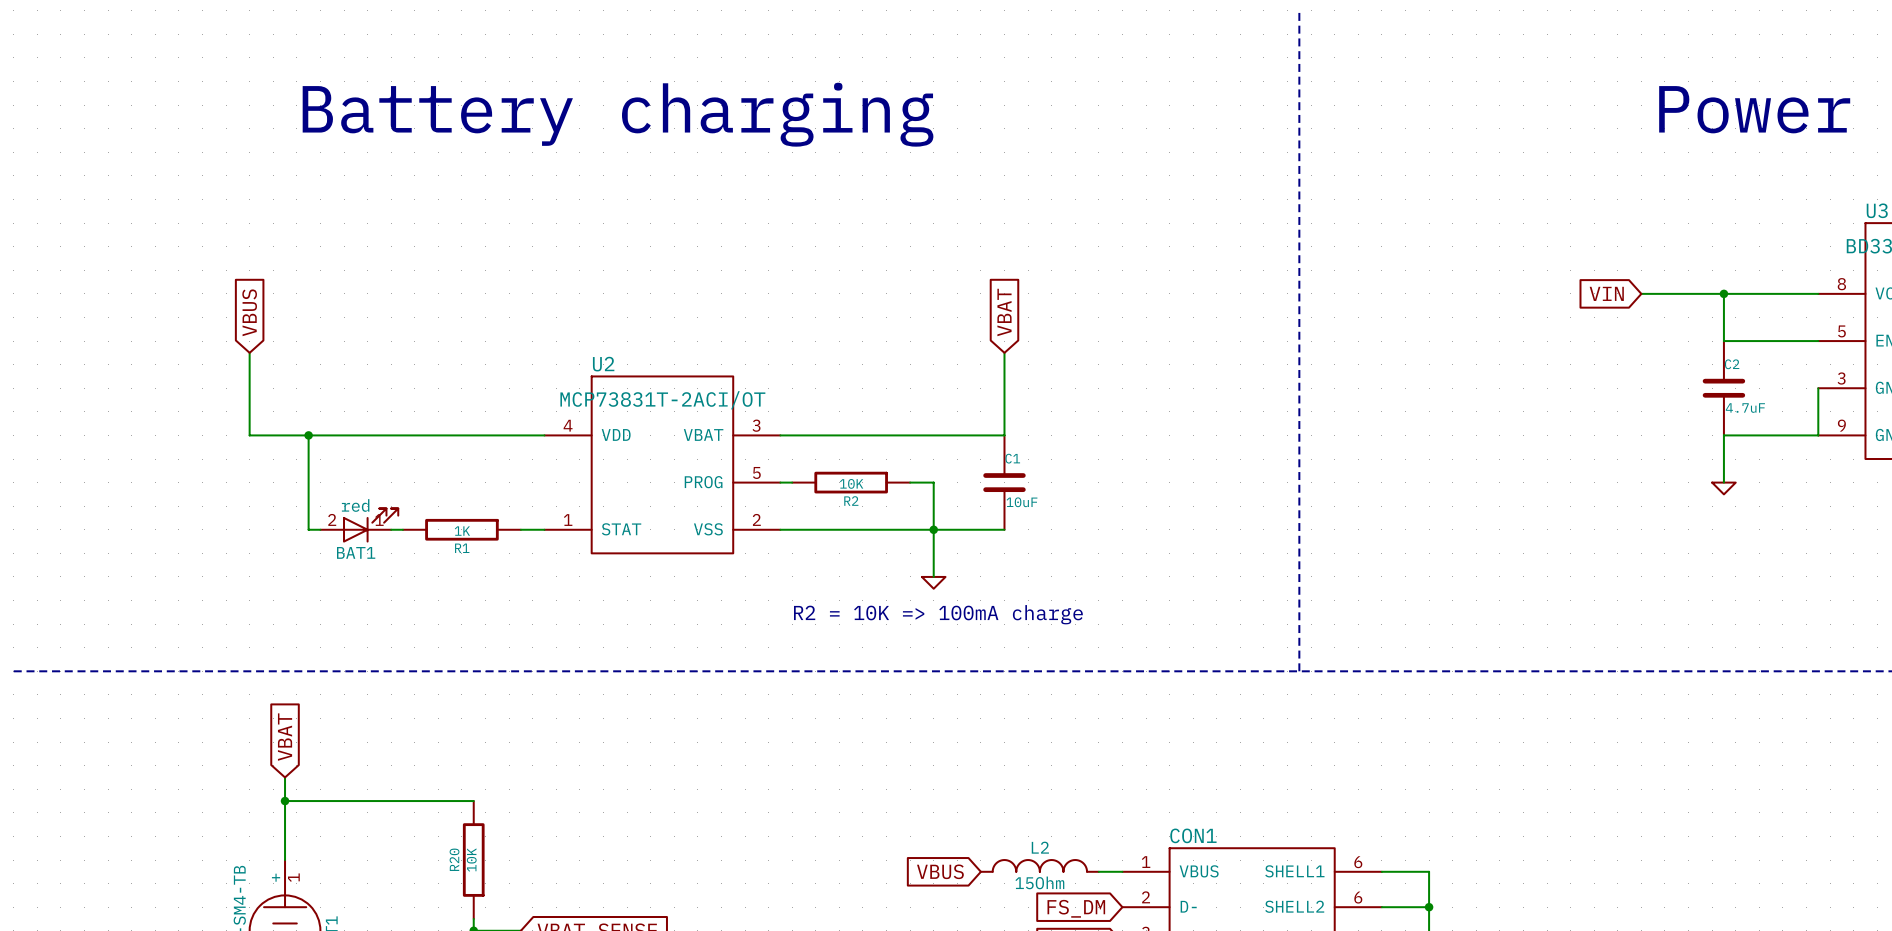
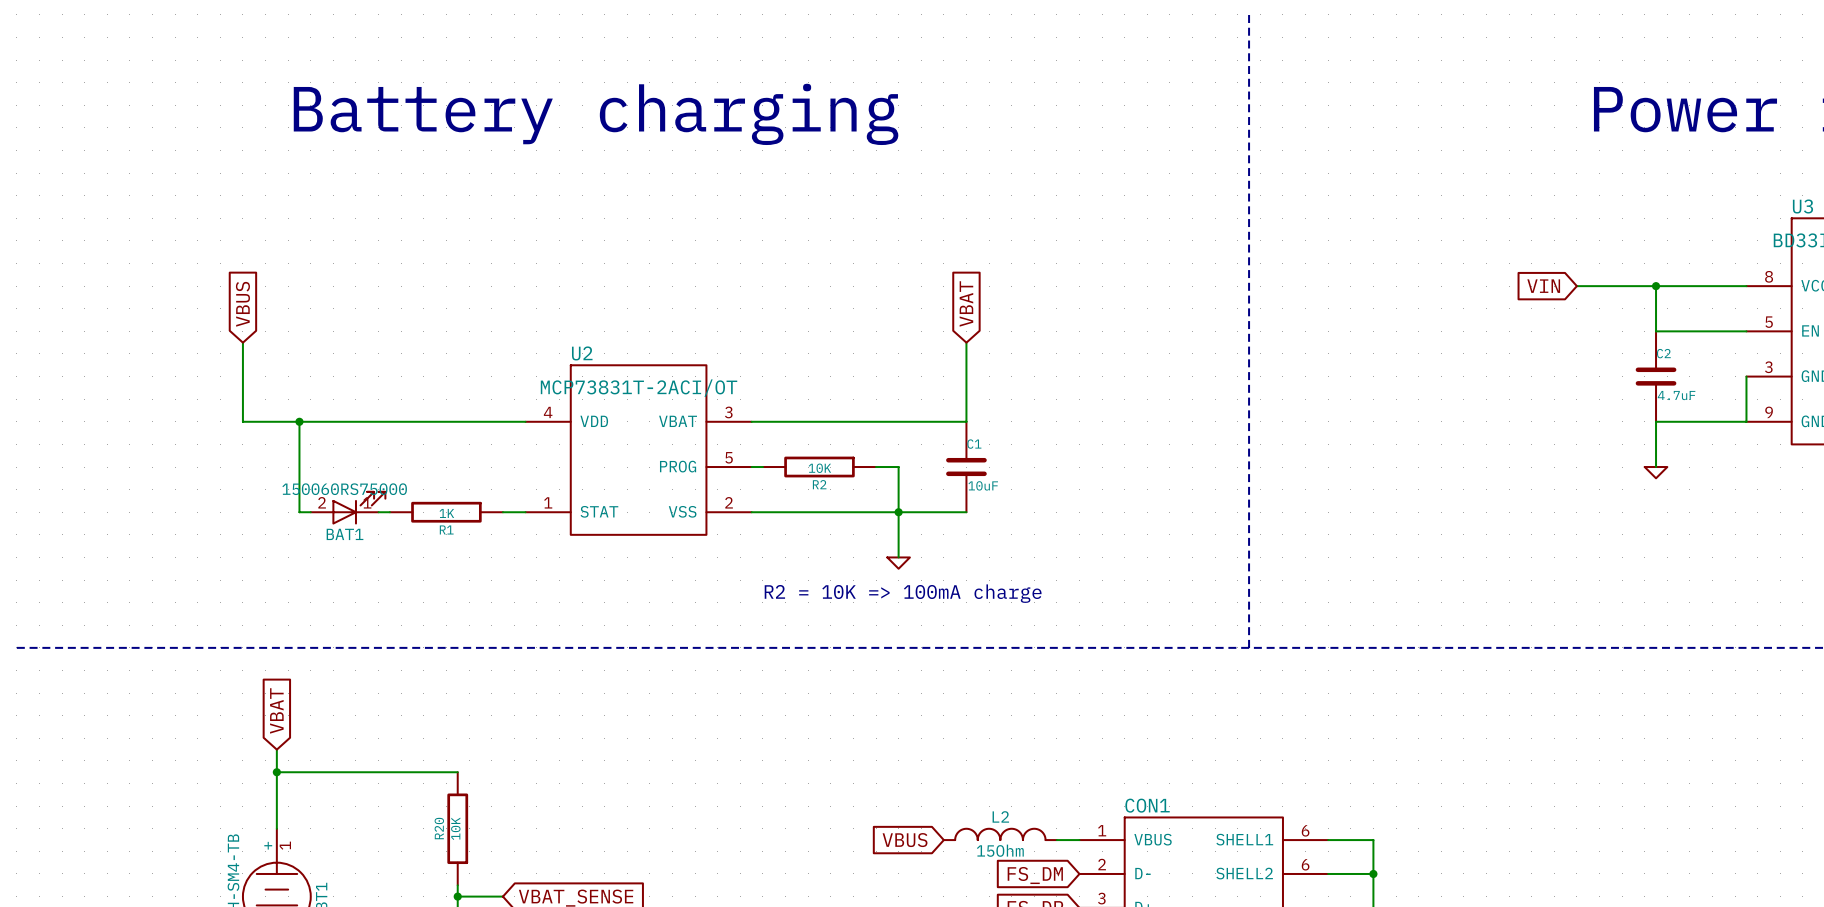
BAT1 value: red (355, 505) -> 150060RS75000 (344, 489)

